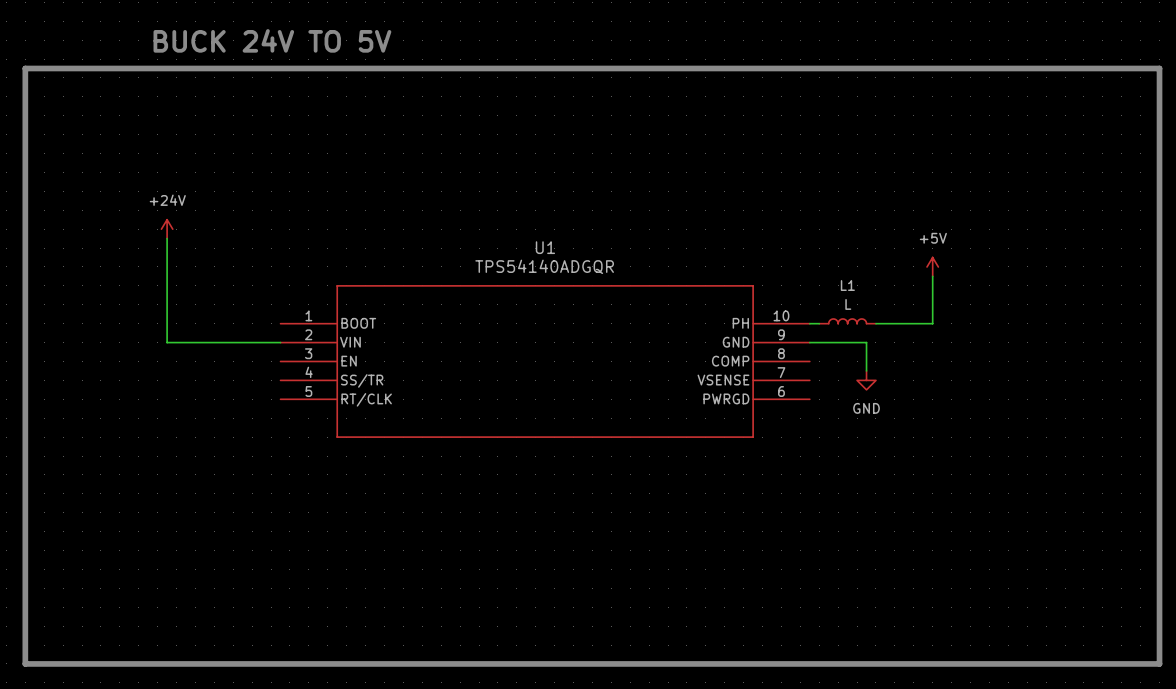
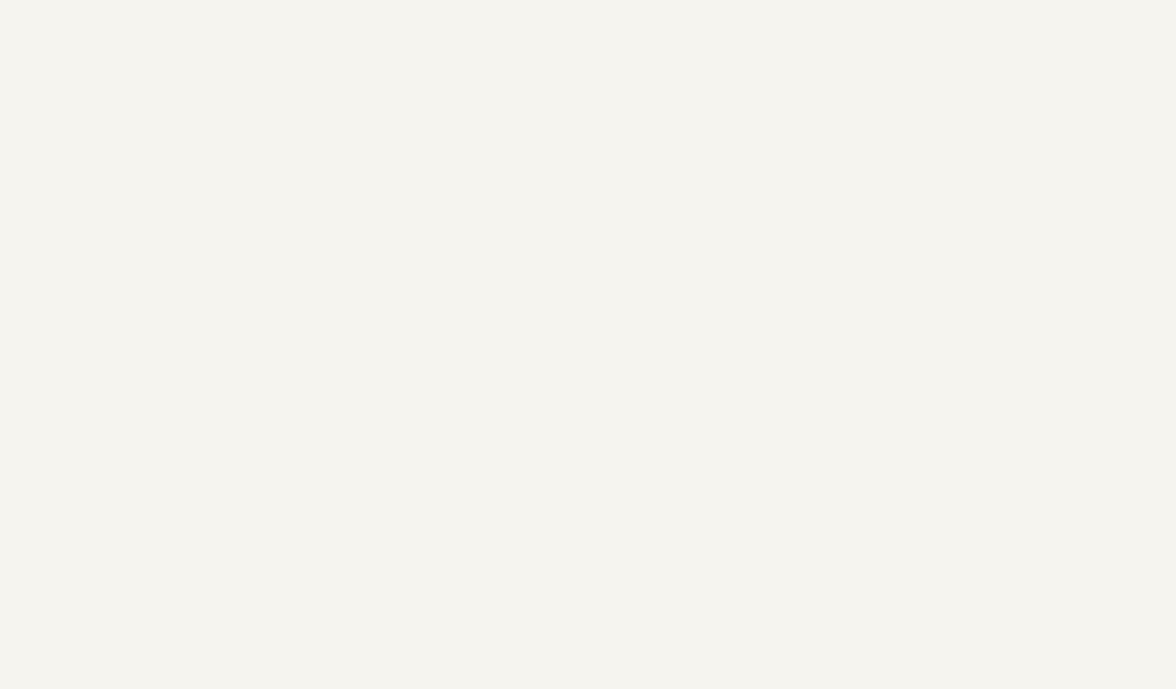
text: BUCK 24V TO 5V (272, 40) -> none
line: (25, 68) (1159, 68) (1159, 663) (25, 663) (25, 68) -> none
power symbol: +24V (167, 229) -> none
wire: (167, 238) (167, 342) (280, 342) -> none
power symbol: +5V (932, 266) -> none
wire: (932, 276) (932, 323) (875, 323) -> none
L1: L (847, 321) -> none
wire: (809, 323) (819, 323) -> none
wire: (809, 342) (866, 342) (866, 370) -> none
U1: TPS54140ADGQR (545, 361) -> none
power symbol: GND (866, 380) -> none

